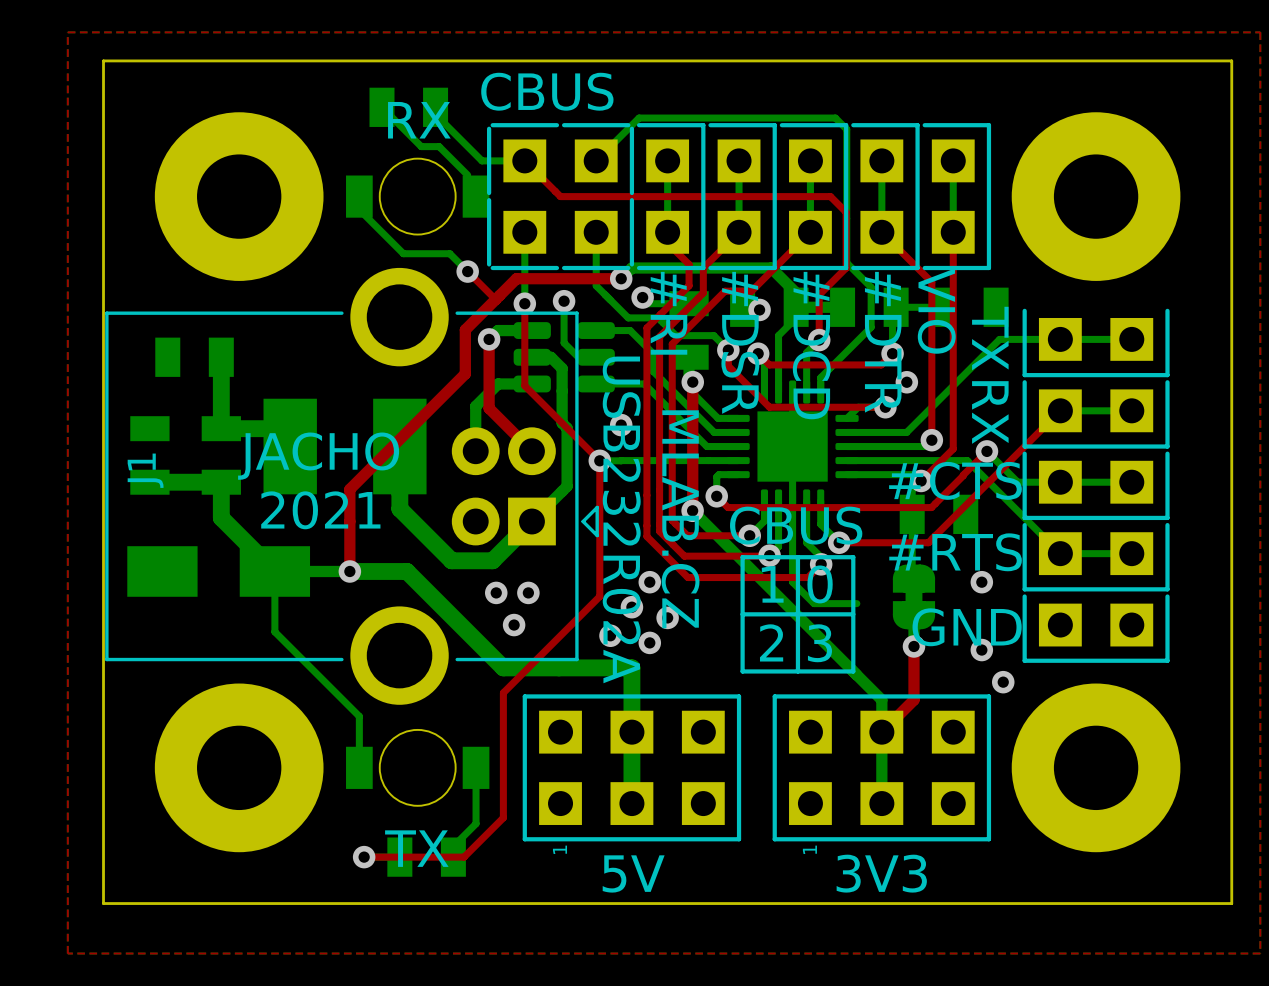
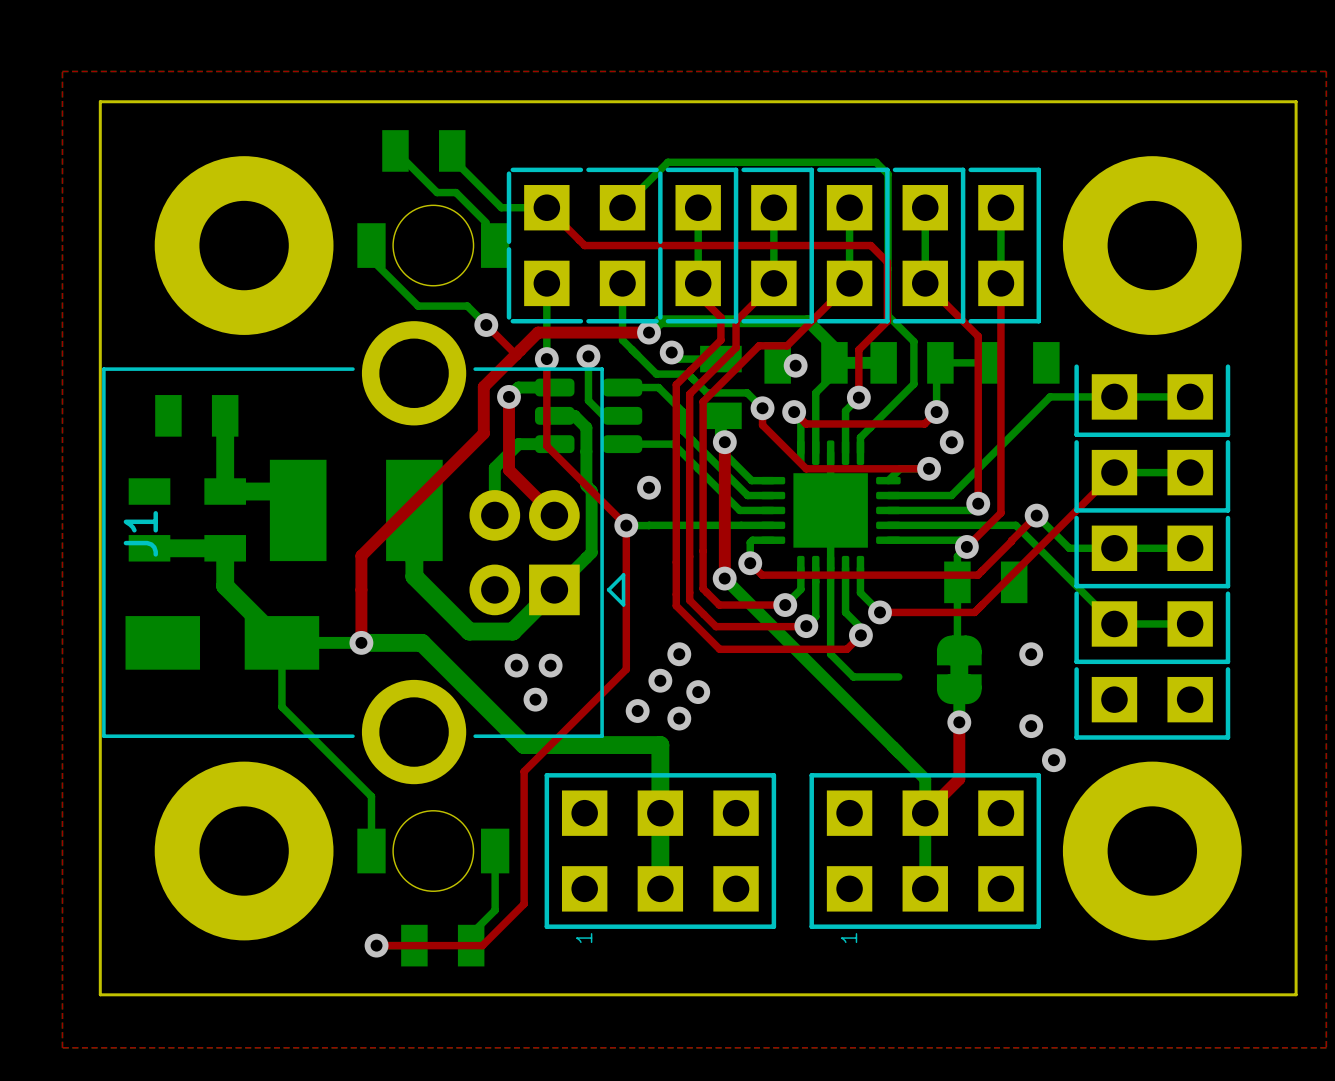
text: CBUS (547, 91) -> none
text: RX (419, 120) -> none
text: VIO (936, 311) -> none
text: #RI (668, 313) -> none
text: TX (990, 338) -> none
text: #DSR (740, 342) -> none
text: #DTR (883, 342) -> none
text: #DCD (811, 345) -> none
text: RX (990, 412) -> none
text: JACHO (318, 456) -> none
text: #CTS (955, 480) -> none
text: 2021 (320, 510) -> none
text: USB232R02A (621, 519) -> none
text: MLAB.CZ (680, 519) -> none
text: CBUS (796, 525) -> none
text: #RTS (955, 552) -> none
line: (742, 557) (742, 671) (853, 671) (853, 557) (742, 557) -> none
line: (797, 557) (797, 671) -> none
text: 1 0 (797, 584) -> none
line: (742, 614) (853, 614) -> none
text: GND (967, 627) -> none
text: 2 3 (795, 643) -> none
text: TX (416, 848) -> none
text: 5V (633, 873) -> none
text: 3V3 (881, 873) -> none

